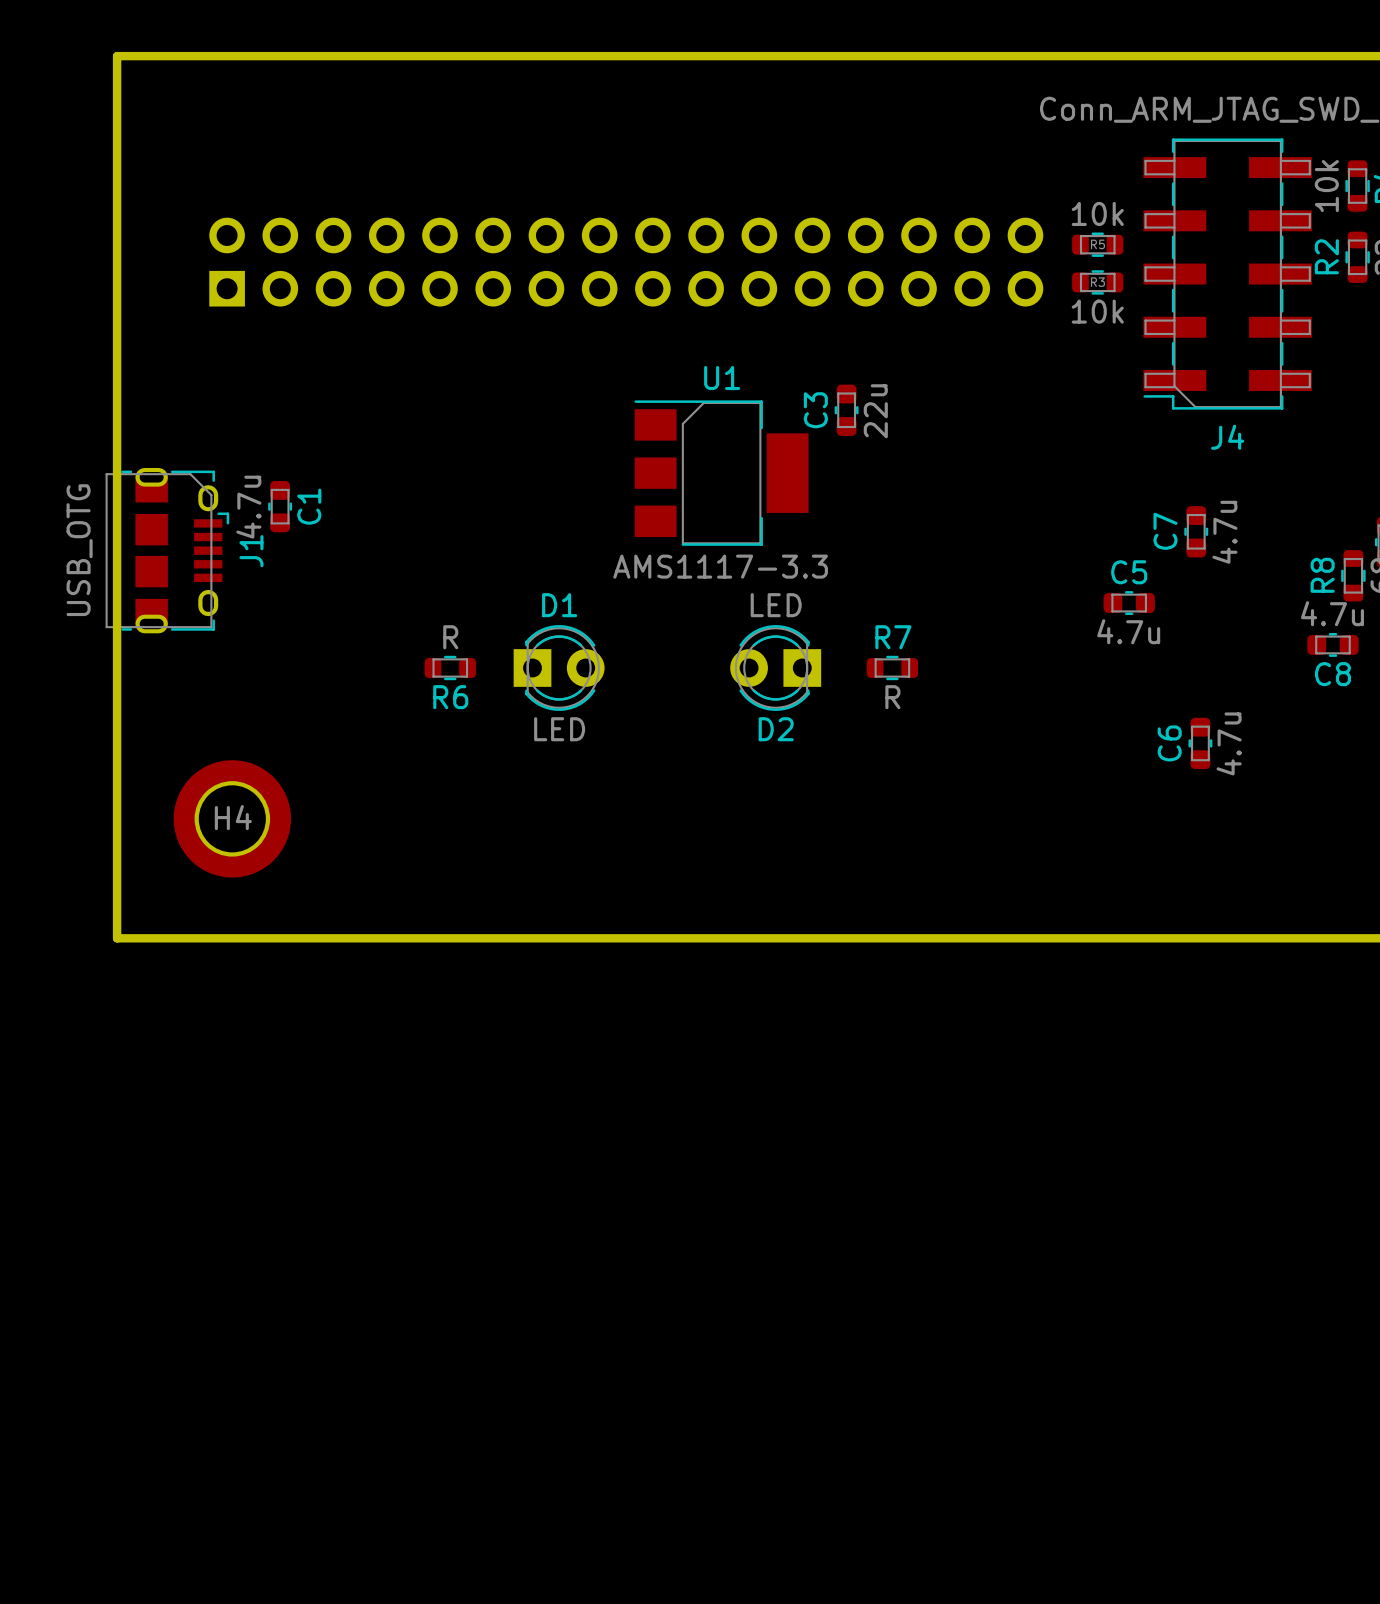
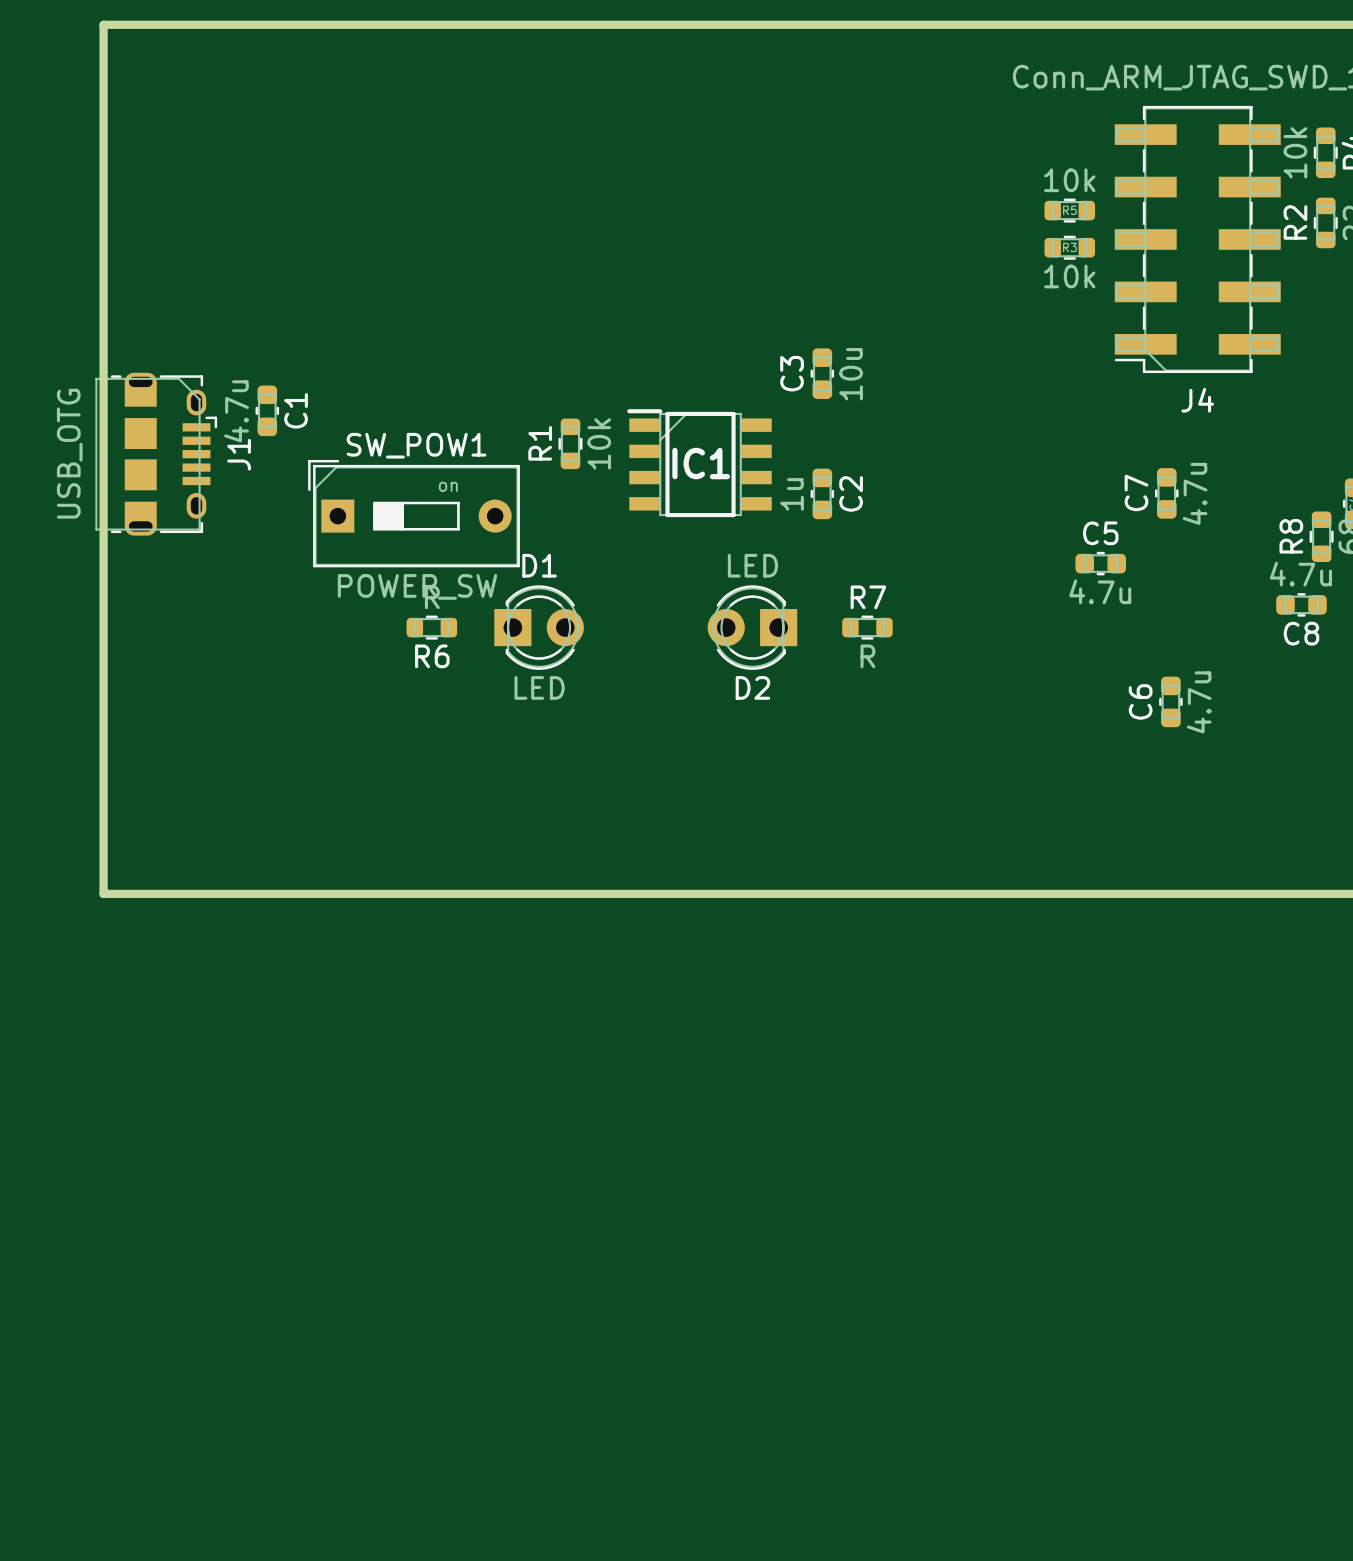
part: (626, 262) -> none
C3 value: 22u (875, 411) -> 10u (851, 374)
U1: AMS1117-3.3 (721, 473) -> none
R1: none -> 10k (570, 443)
IC1: none -> (699, 463)
C1 position: (280, 506) -> (267, 410)
C2: none -> 1u (822, 493)
J1 position: (167, 550) -> (156, 454)
SW_POW1: none -> POWER_SW (414, 513)
H4: (232, 818) -> none

